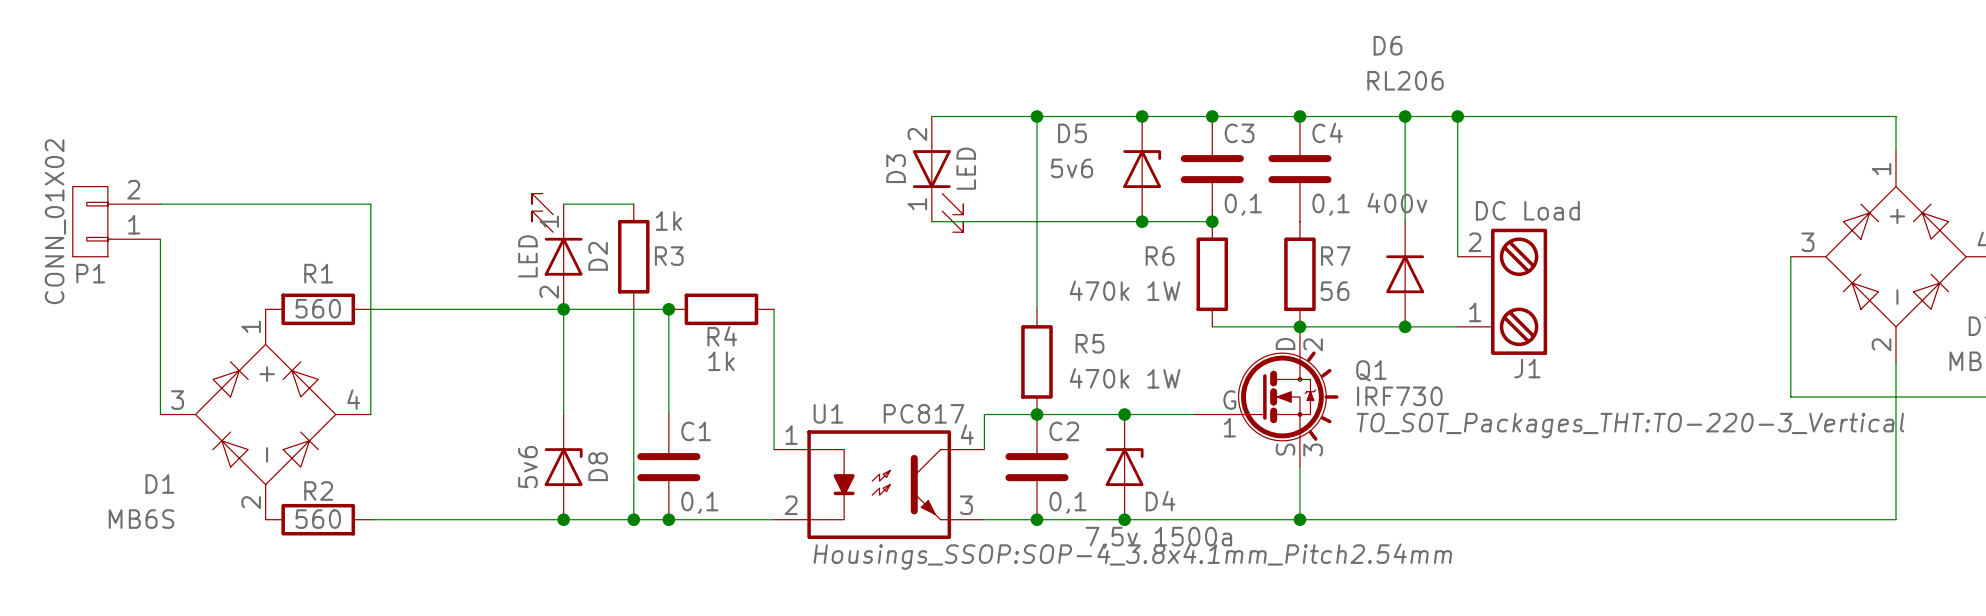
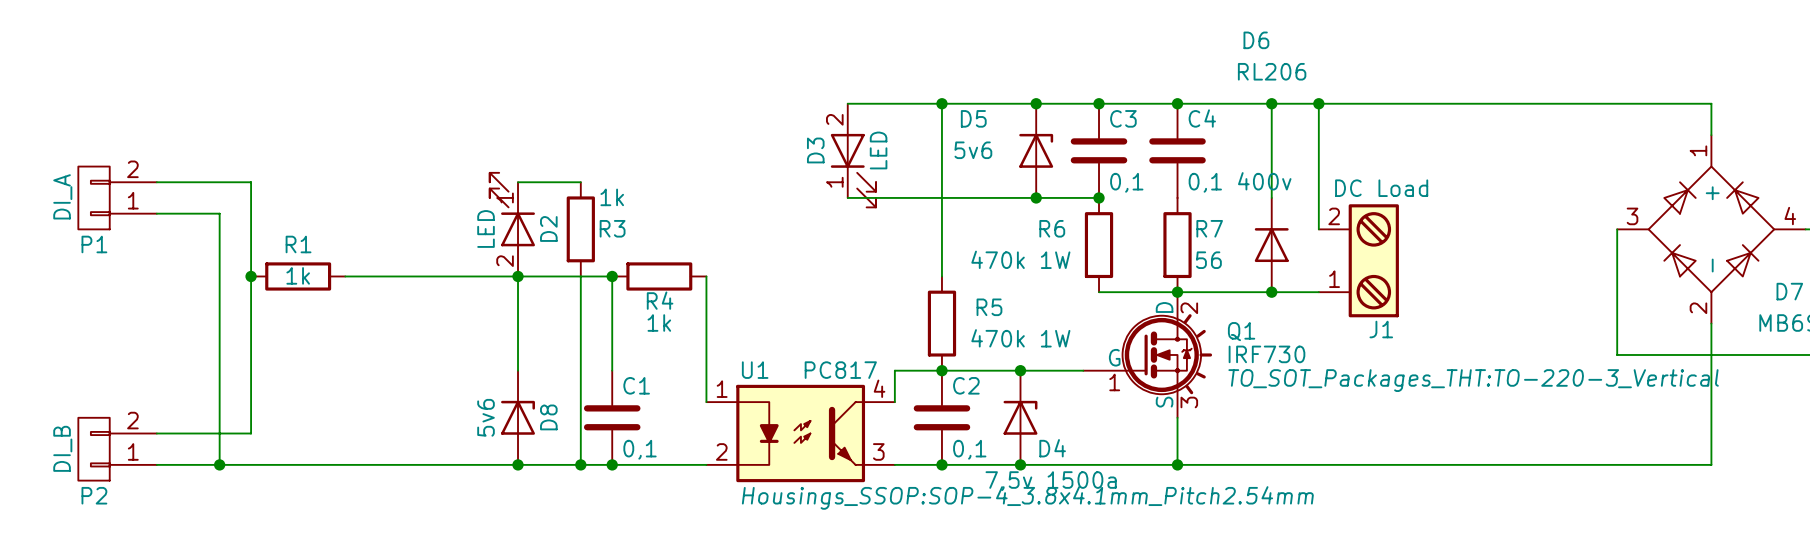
wire: (265, 204) (370, 204) (370, 414) -> (251, 182) (251, 433) (156, 433)
P1 value: CONN_01X02 (55, 221) -> DI_A (62, 196)
wire: (160, 239) (160, 414) -> (156, 213) (219, 213) (219, 464)
R1 value: 560 (318, 308) -> 1k (298, 275)
junction: none -> (251, 276)
D1: MB6S (265, 414) -> none
P2: none -> DI_B (117, 449)
wire: none -> (156, 464) (345, 464)
junction: none -> (219, 464)
R2: 560 (318, 519) -> none

